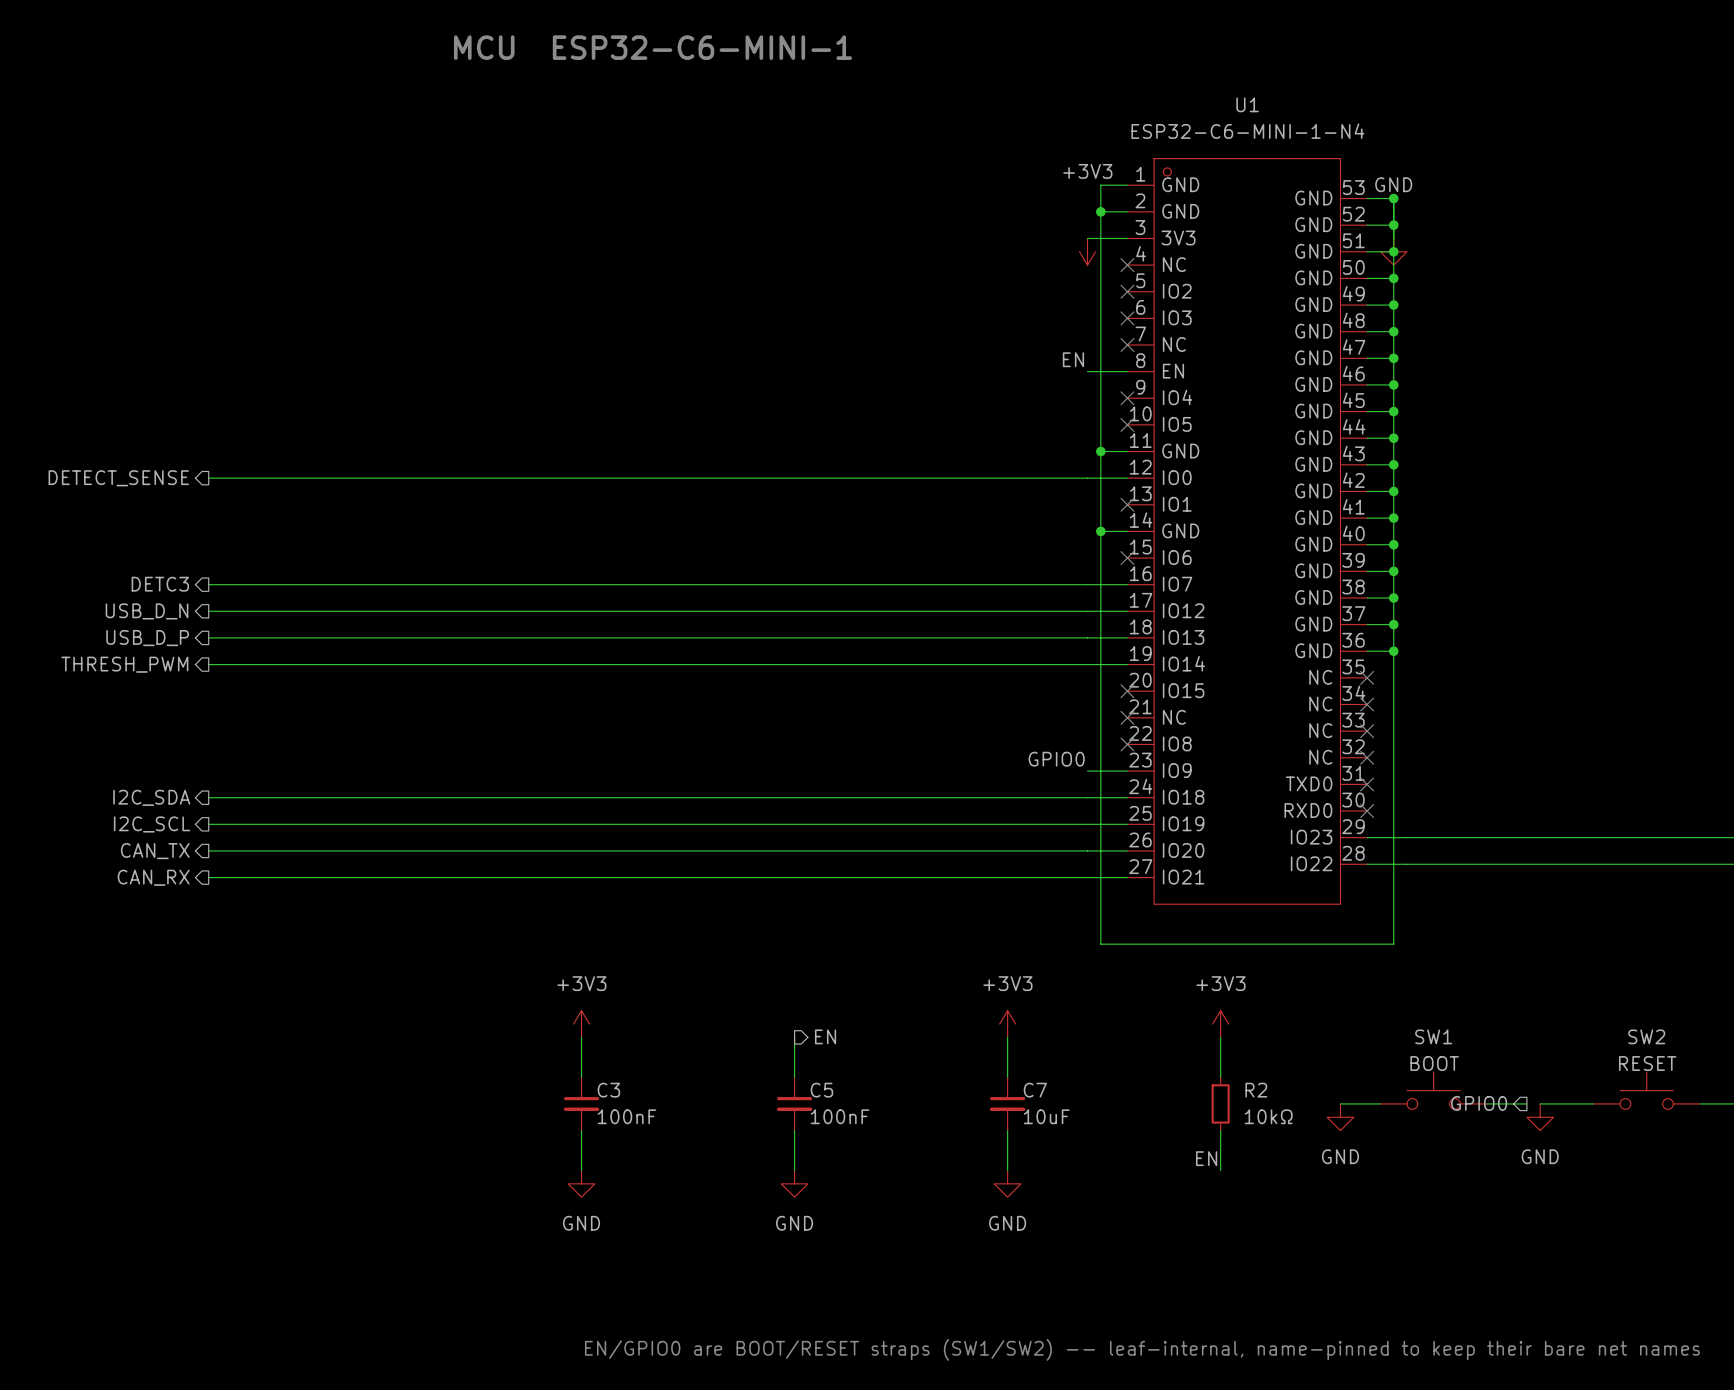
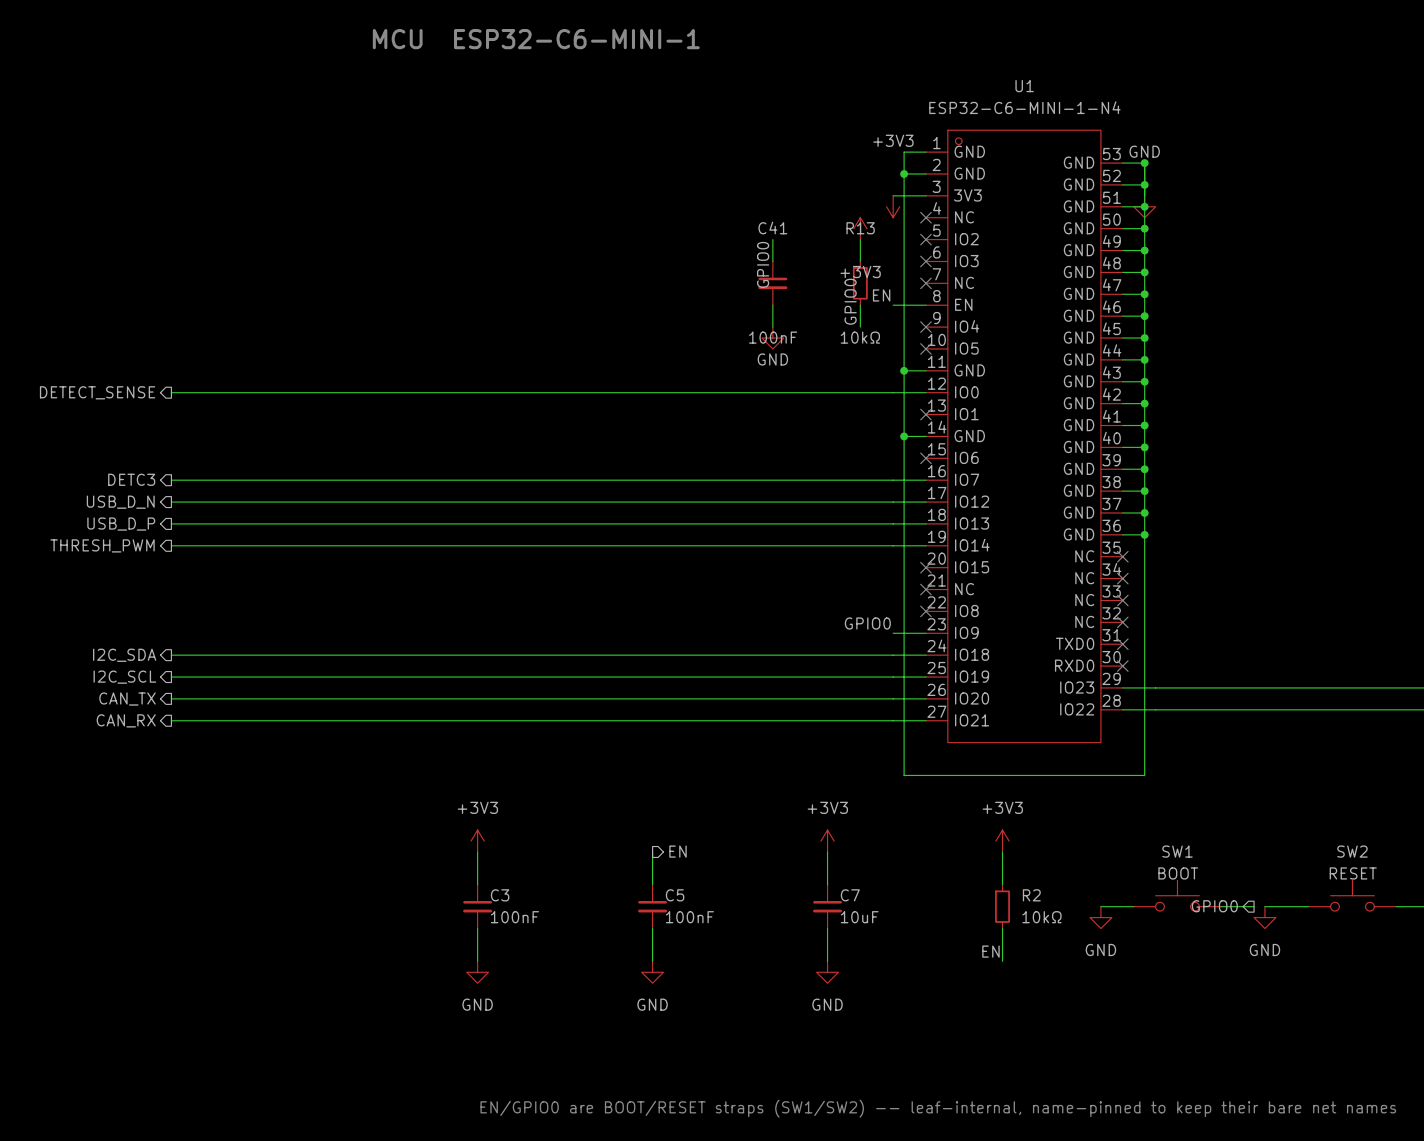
power symbol: none -> +3V3 (860, 228)
wire: none -> (772, 239) (772, 261)
wire: none -> (860, 239) (860, 261)
label: none -> GPIO0 (763, 264)
C41: none -> 100nF (772, 283)
R13: none -> 10kΩ (860, 283)
label: none -> GPIO0 (850, 301)
wire: none -> (772, 305) (772, 327)
wire: none -> (860, 305) (860, 327)
power symbol: none -> GND (772, 338)

